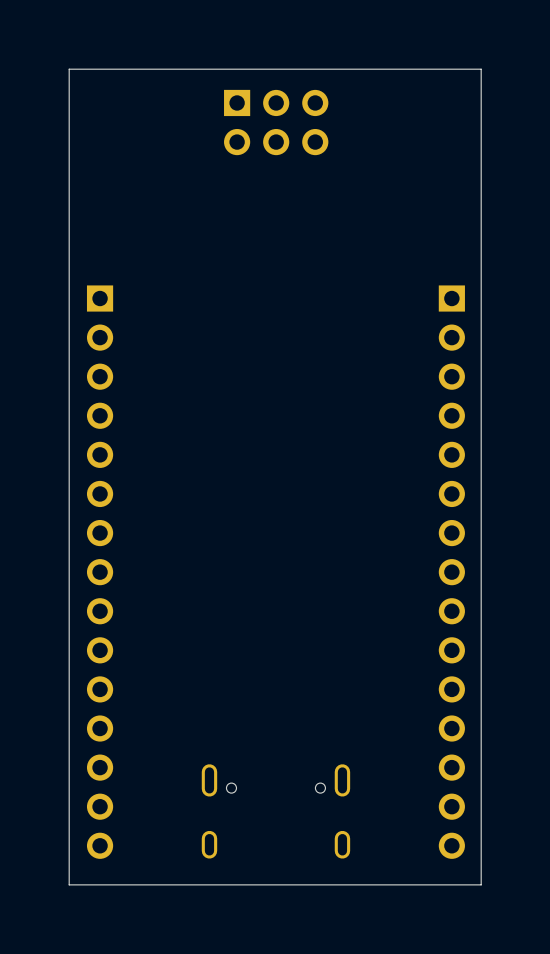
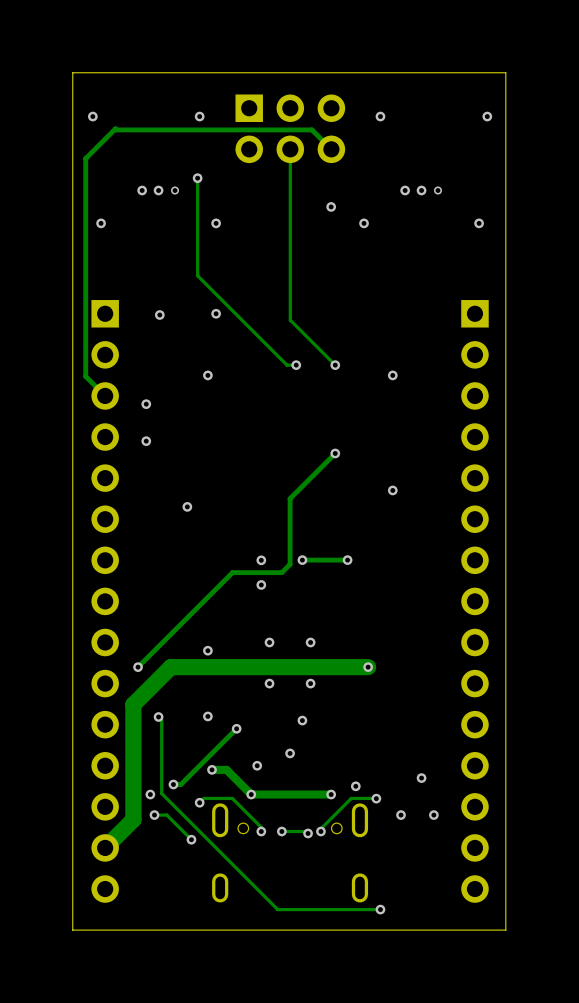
via: none -> (92, 116)
via: none -> (199, 116)
via: none -> (380, 116)
via: none -> (487, 116)
track: none -> (290, 149) (290, 320) (335, 365)
track: none -> (331, 149) (311, 129) (115, 128) (85, 158) (85, 376) (105, 395)
track: none -> (197, 178) (197, 275) (287, 365) (296, 365)
via: none -> (197, 178)
via: none -> (142, 190)
via: none -> (158, 190)
via: none -> (175, 190)
via: none -> (405, 190)
via: none -> (421, 190)
via: none -> (437, 190)
via: none -> (331, 206)
via: none -> (101, 223)
via: none -> (216, 223)
via: none -> (364, 223)
via: none -> (479, 223)
via: none -> (216, 313)
via: none -> (159, 314)
via: none -> (296, 365)
via: none -> (335, 365)
via: none -> (207, 375)
via: none -> (392, 375)
via: none -> (146, 404)
via: none -> (146, 441)
track: none -> (335, 453) (290, 498) (290, 564) (281, 572) (232, 572) (138, 667)
via: none -> (335, 453)
via: none -> (392, 490)
via: none -> (187, 506)
via: none -> (302, 560)
track: none -> (347, 560) (302, 560)
via: none -> (347, 560)
via: none -> (261, 560)
via: none -> (261, 584)
via: none -> (269, 642)
via: none -> (310, 642)
via: none -> (207, 650)
via: none -> (138, 667)
track: none -> (368, 667) (170, 667) (133, 704) (133, 819) (105, 847)
via: none -> (368, 667)
via: none -> (269, 683)
via: none -> (310, 683)
via: none -> (207, 716)
track: none -> (158, 717) (161, 720) (161, 793) (277, 909) (380, 909)
via: none -> (158, 717)
via: none -> (302, 720)
track: none -> (236, 728) (180, 784) (173, 784)
via: none -> (236, 728)
via: none -> (290, 753)
via: none -> (257, 765)
track: none -> (212, 769) (226, 769) (251, 794) (331, 794)
via: none -> (212, 769)
via: none -> (421, 778)
via: none -> (173, 784)
via: none -> (355, 786)
via: none -> (150, 794)
via: none -> (251, 794)
via: none -> (331, 794)
track: none -> (376, 798) (351, 798) (320, 828) (320, 831)
via: none -> (376, 798)
track: none -> (199, 802) (203, 798) (232, 798) (261, 827) (261, 831)
via: none -> (199, 802)
track: none -> (154, 815) (166, 815) (191, 839)
via: none -> (154, 815)
via: none -> (401, 815)
via: none -> (433, 815)
via: none -> (261, 831)
track: none -> (281, 831) (306, 831) (308, 833)
via: none -> (281, 831)
via: none -> (320, 831)
via: none -> (308, 833)
via: none -> (191, 839)
via: none -> (380, 909)

